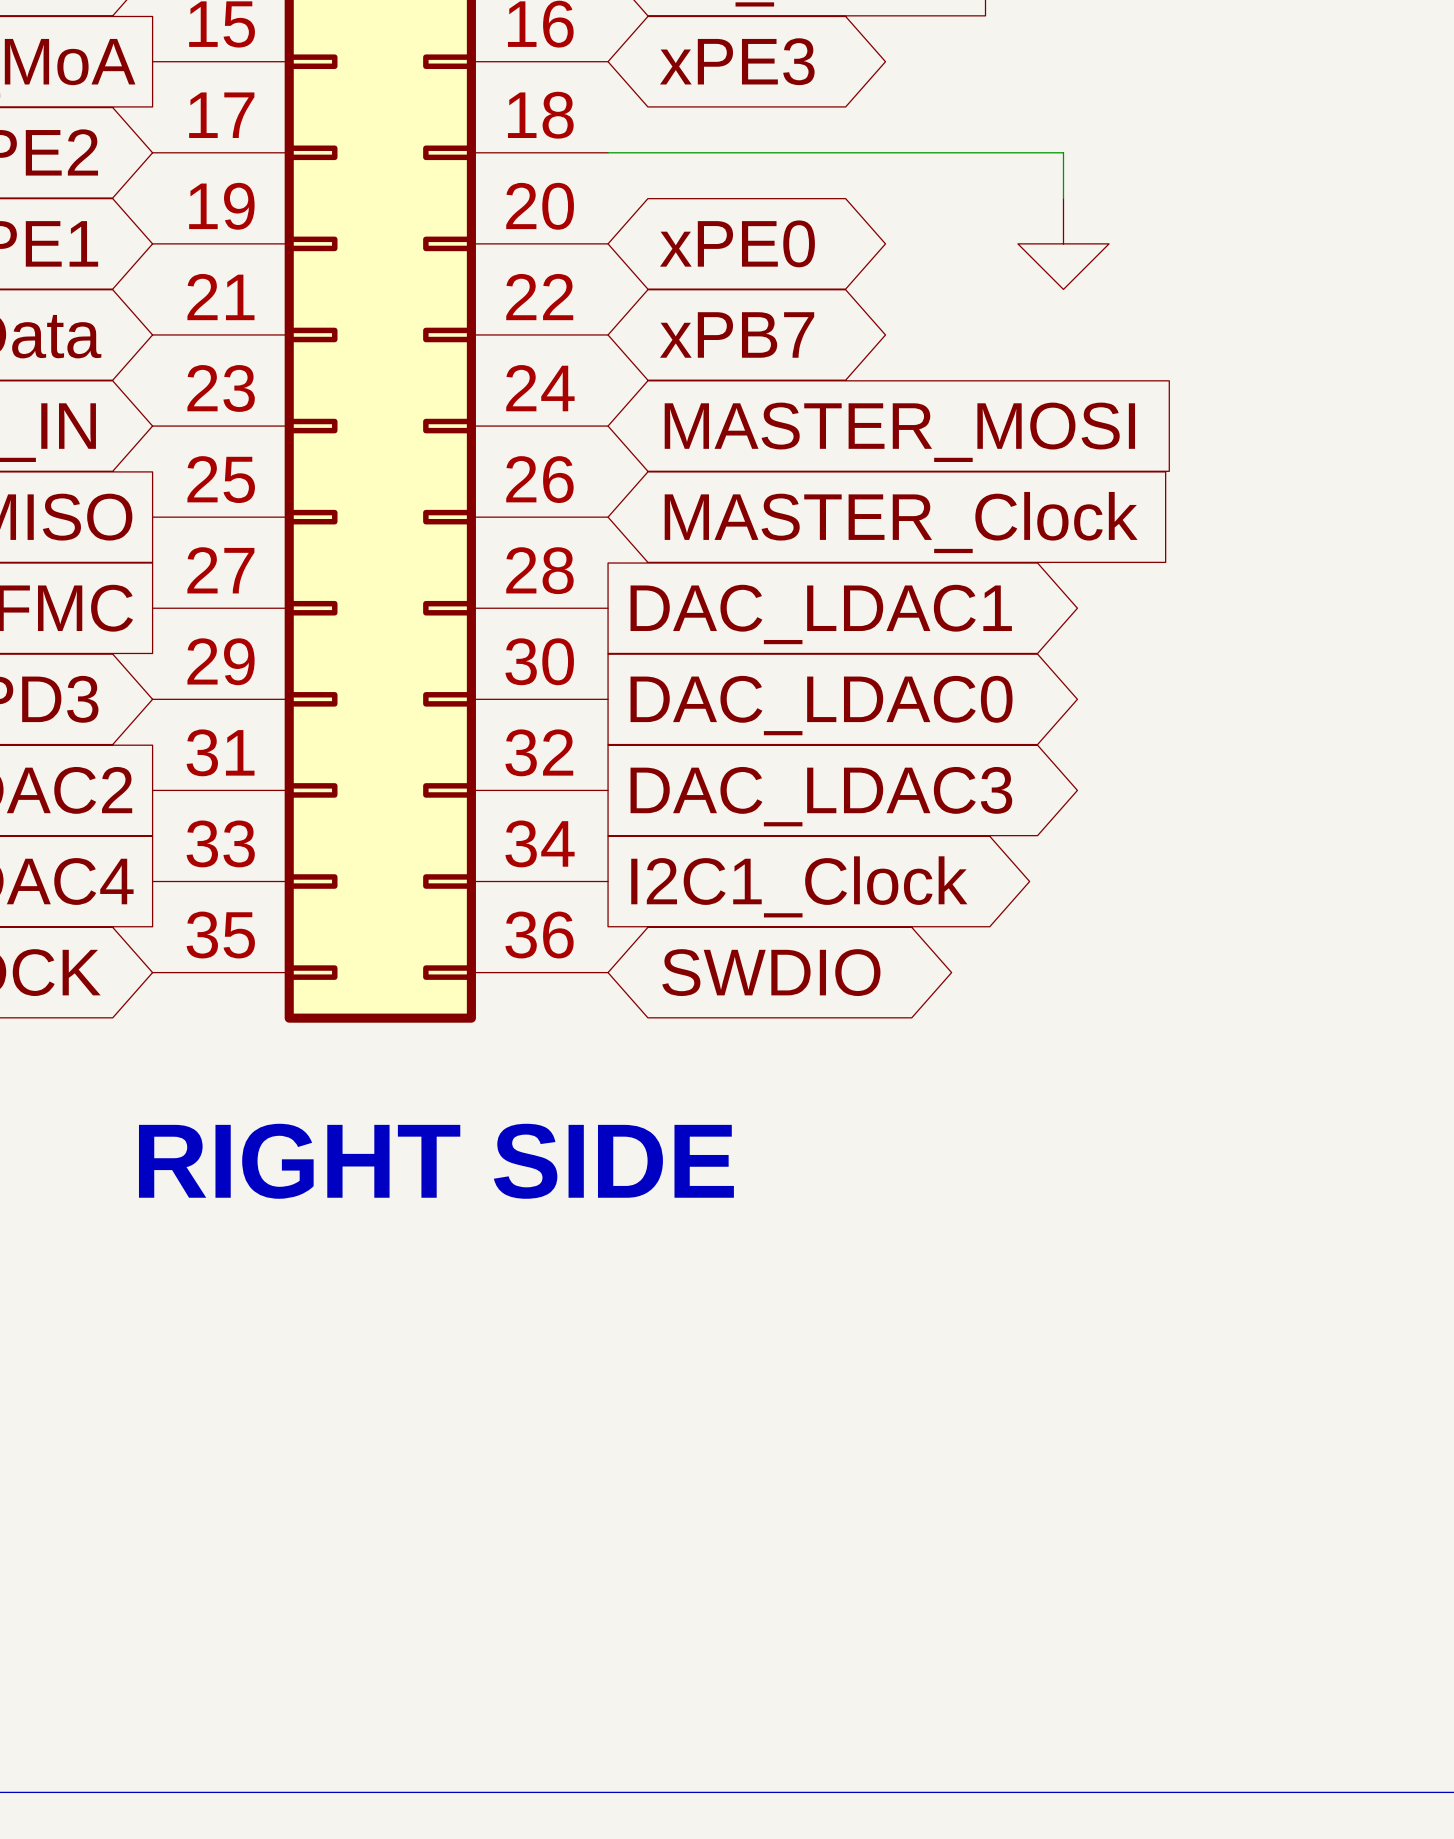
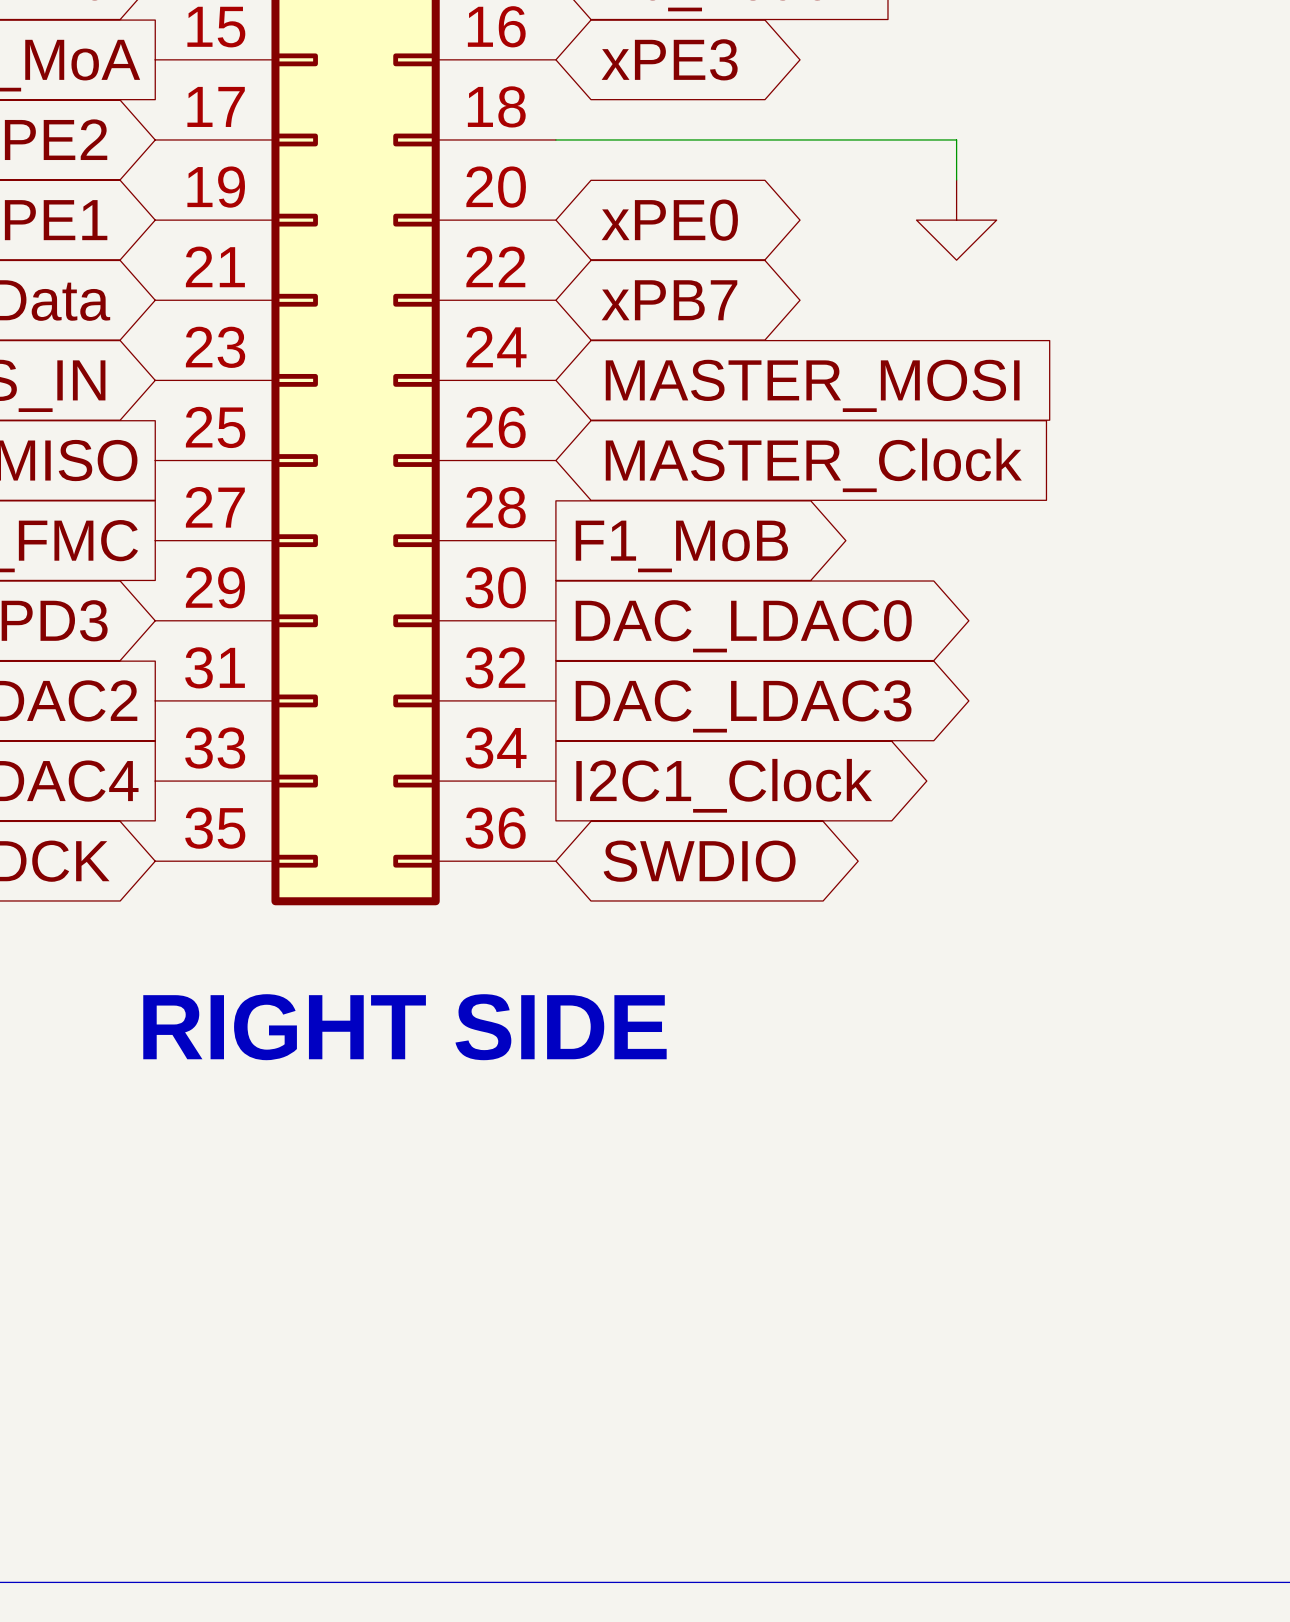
global label: DAC_LDAC1 (821, 614) -> F1_MoB (681, 546)

